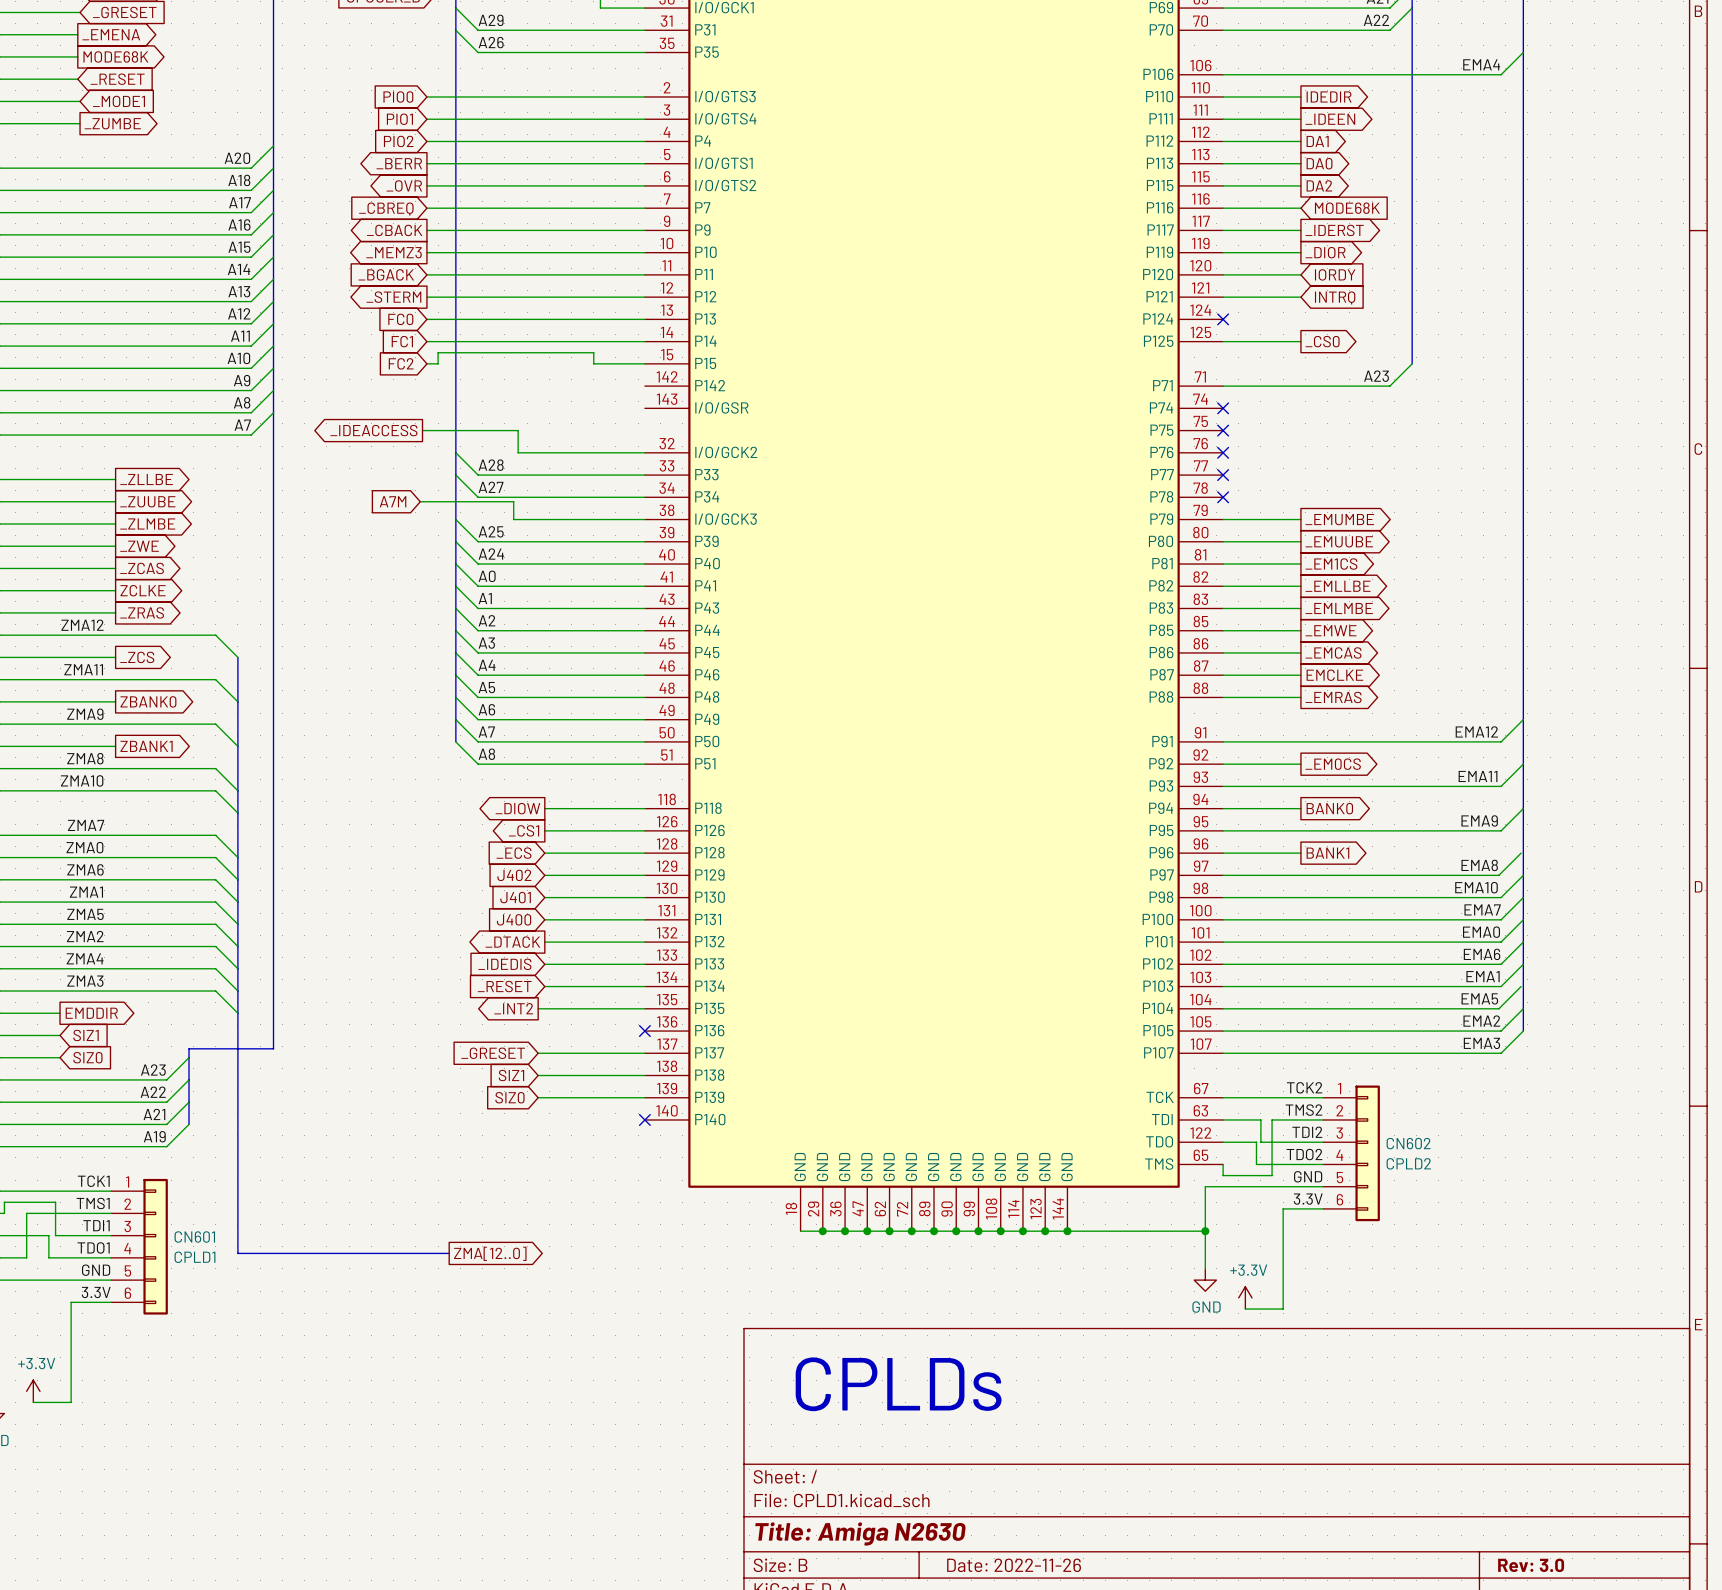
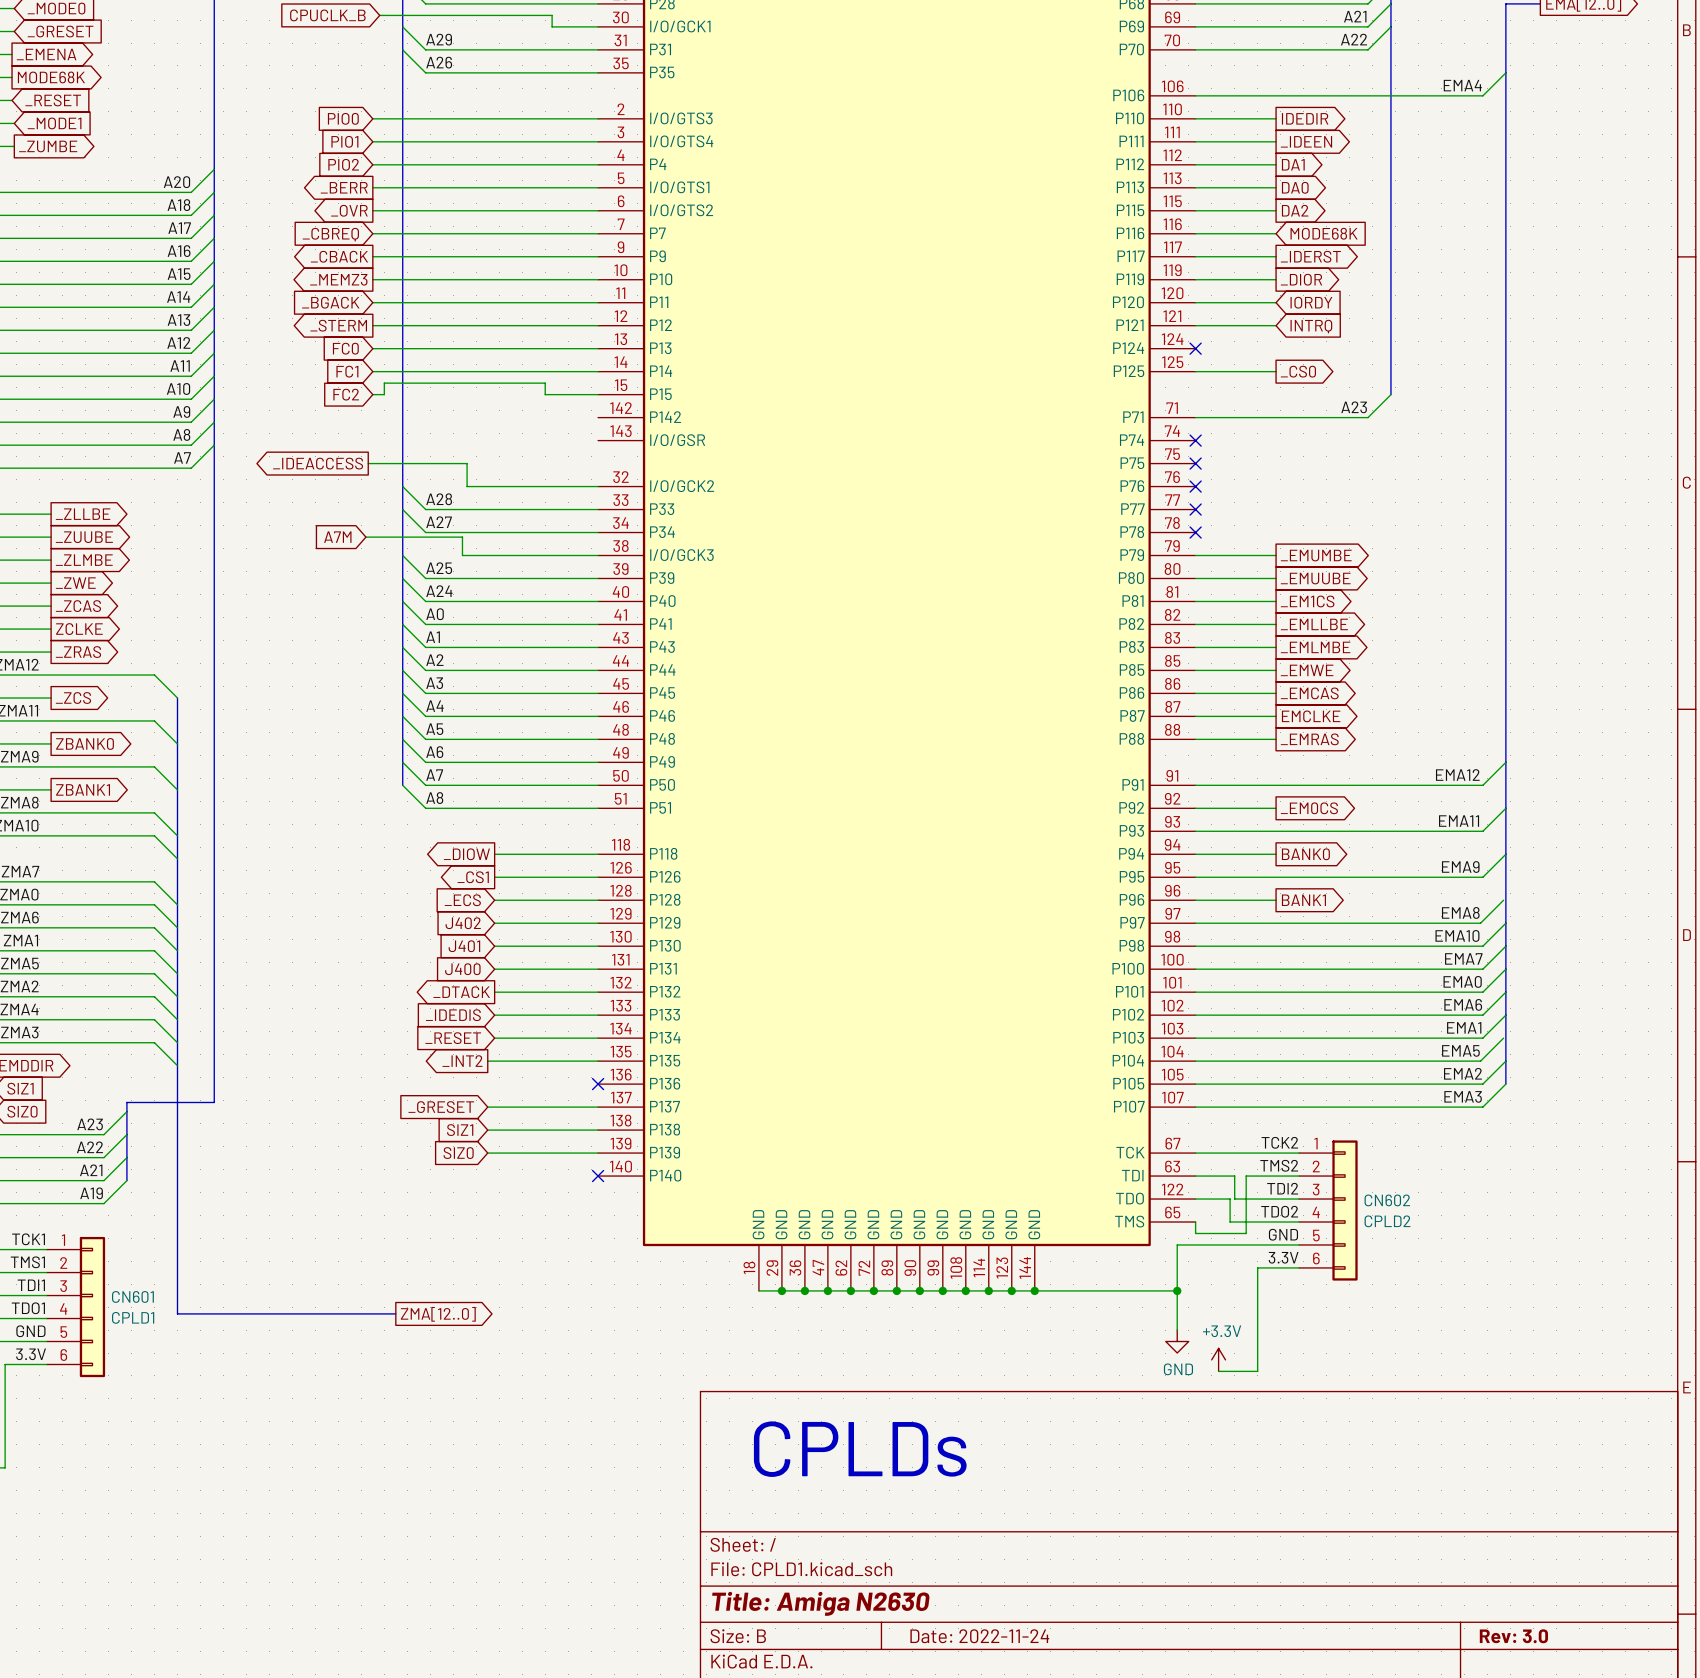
title block: Date: 2022-11-26 (1014, 1565) -> Date: 2022-11-24 (979, 1636)

